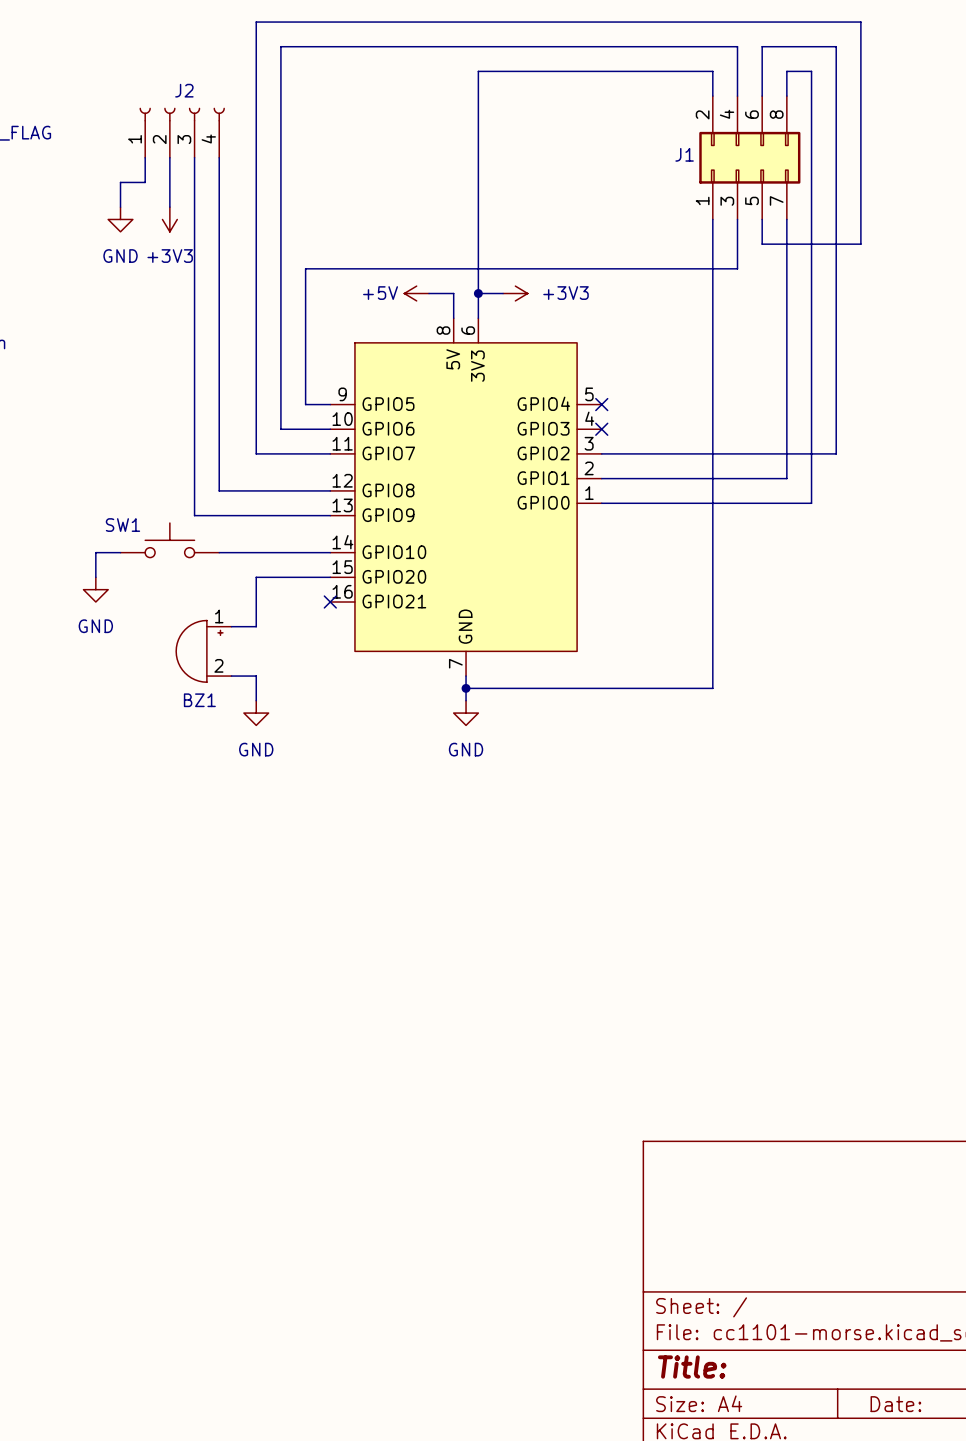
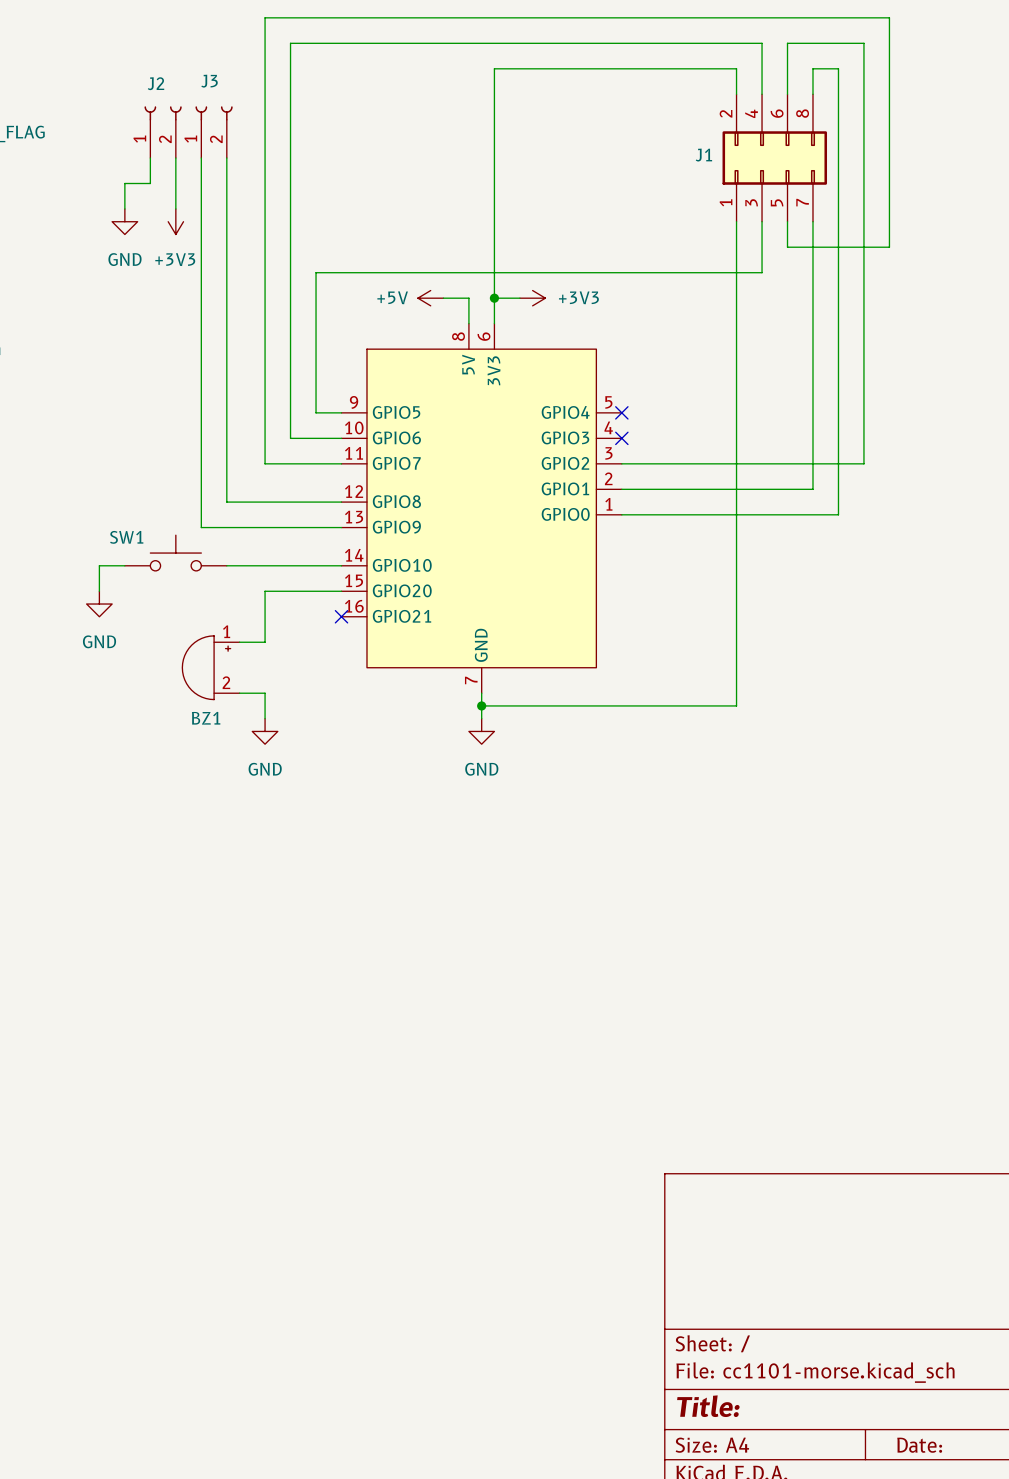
J2 symbol: [139, 107, 225, 158] -> [144, 106, 182, 159]
J3: none -> (214, 132)

